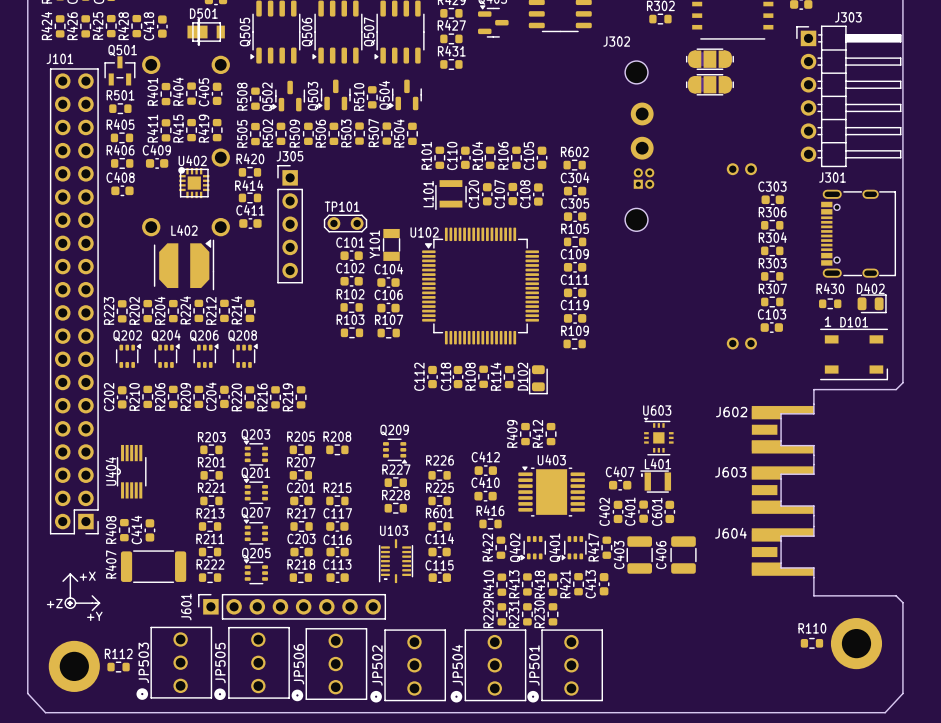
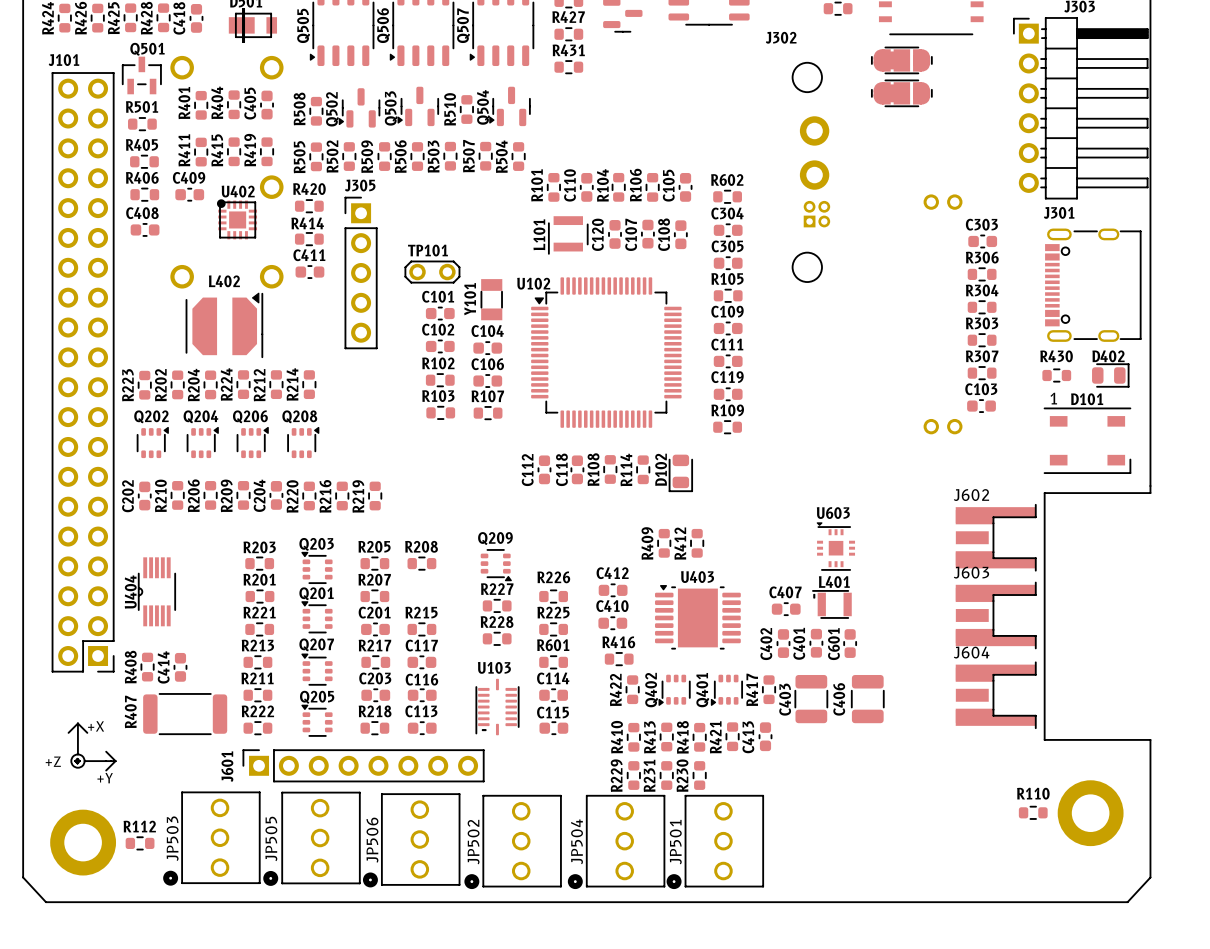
board edge: (902, 382) (896, 389) (813, 389) (813, 404) -> none
J602 name position: J602 (731, 412) -> J602 (971, 495)
board edge: (813, 455) (813, 464) -> none
J603 name position: J603 (730, 472) -> J603 (971, 572)
board edge: (813, 515) (813, 526) -> none
J604 name position: J604 (730, 533) -> J604 (971, 652)
board edge: (813, 577) (813, 595) (896, 595) (902, 602) -> (1150, 477) (1150, 493) (1044, 493) (1044, 739) (1150, 739) (1150, 760)

